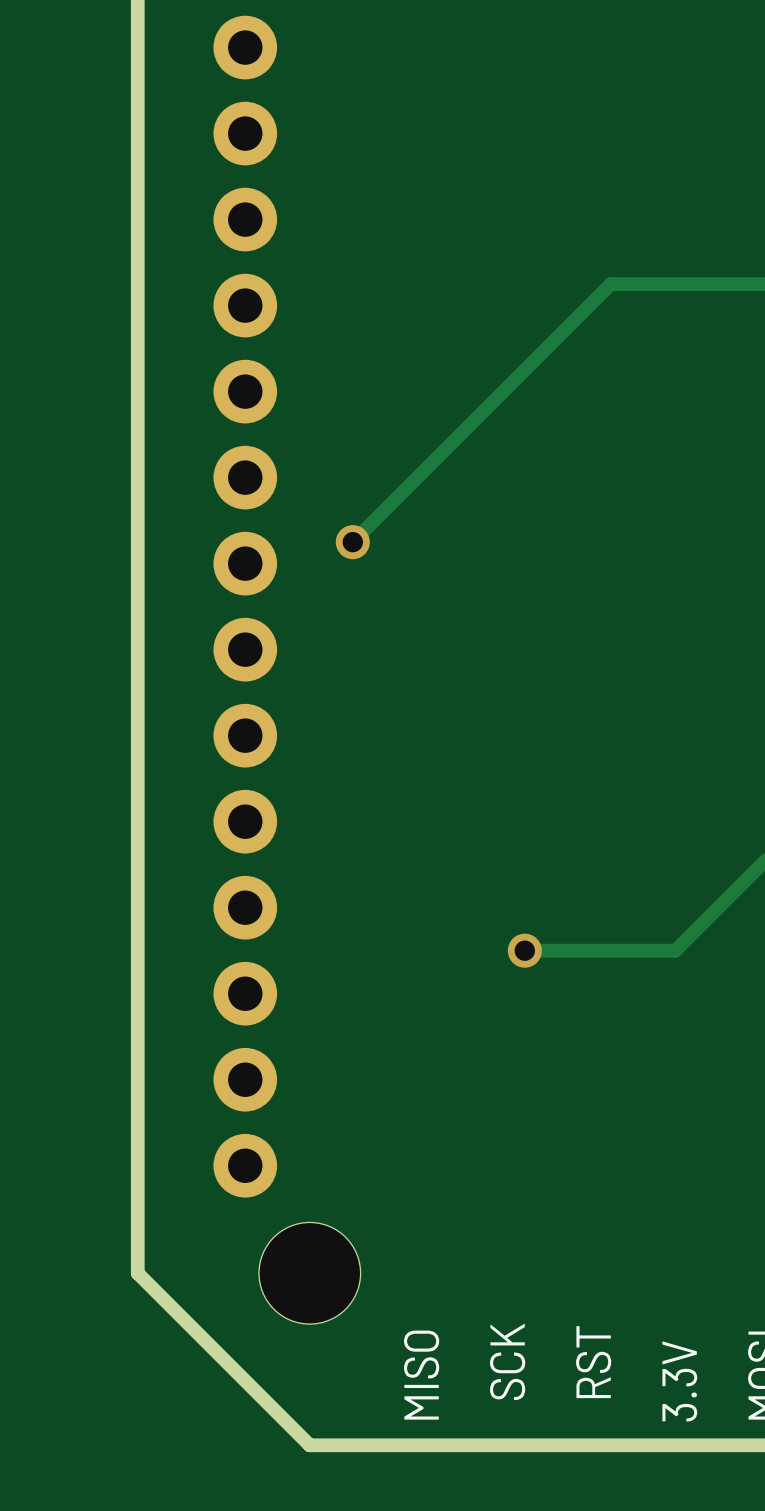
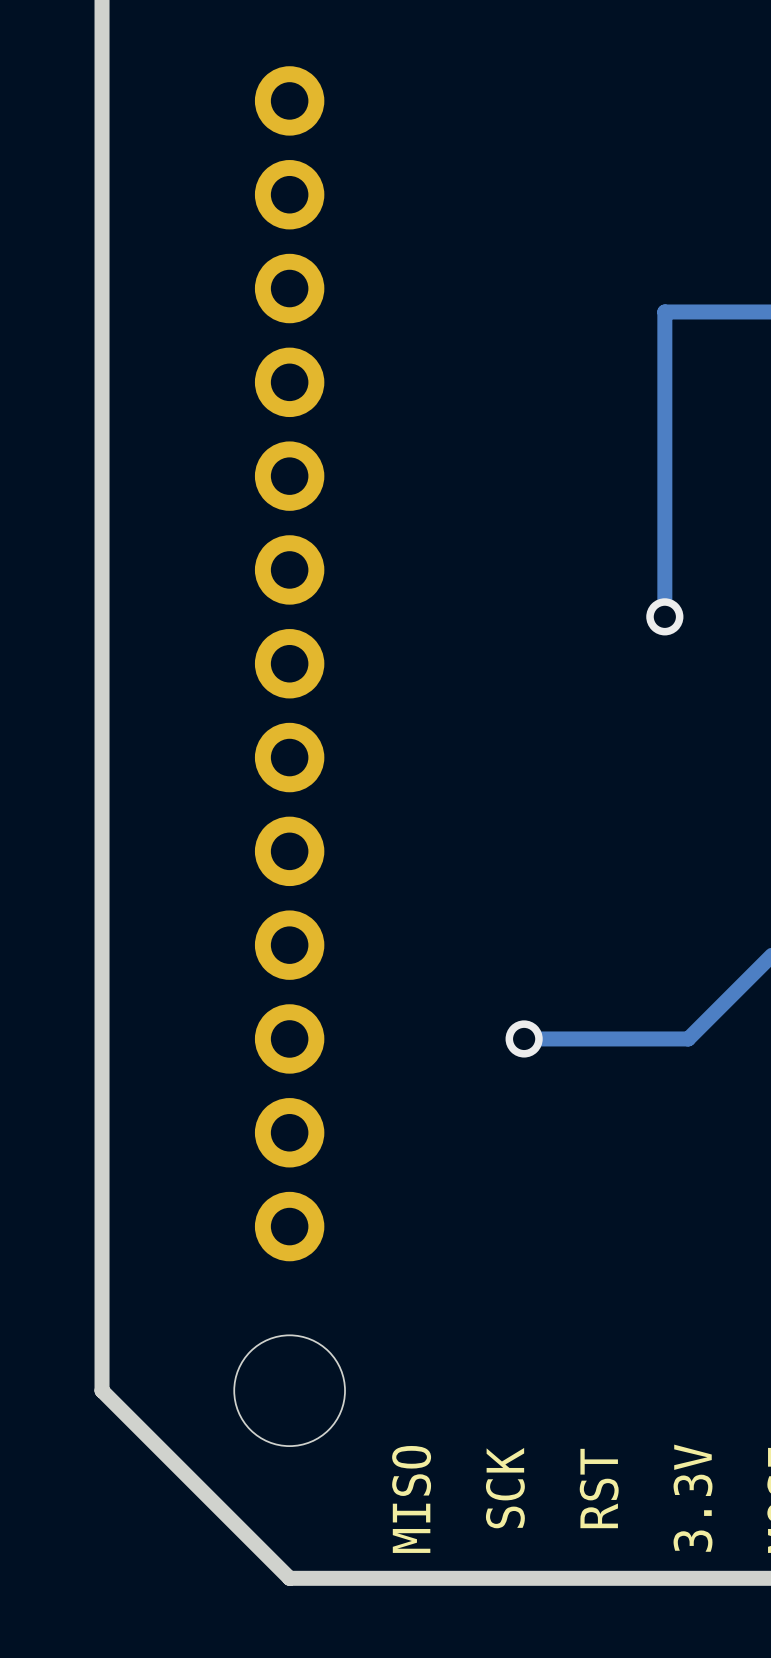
track: (653, 284) (610, 284) (352, 542) -> (664, 311) (664, 616)
via: (352, 542) -> none
via: none -> (664, 616)
part: (245, 606) -> none
part: none -> (289, 663)

